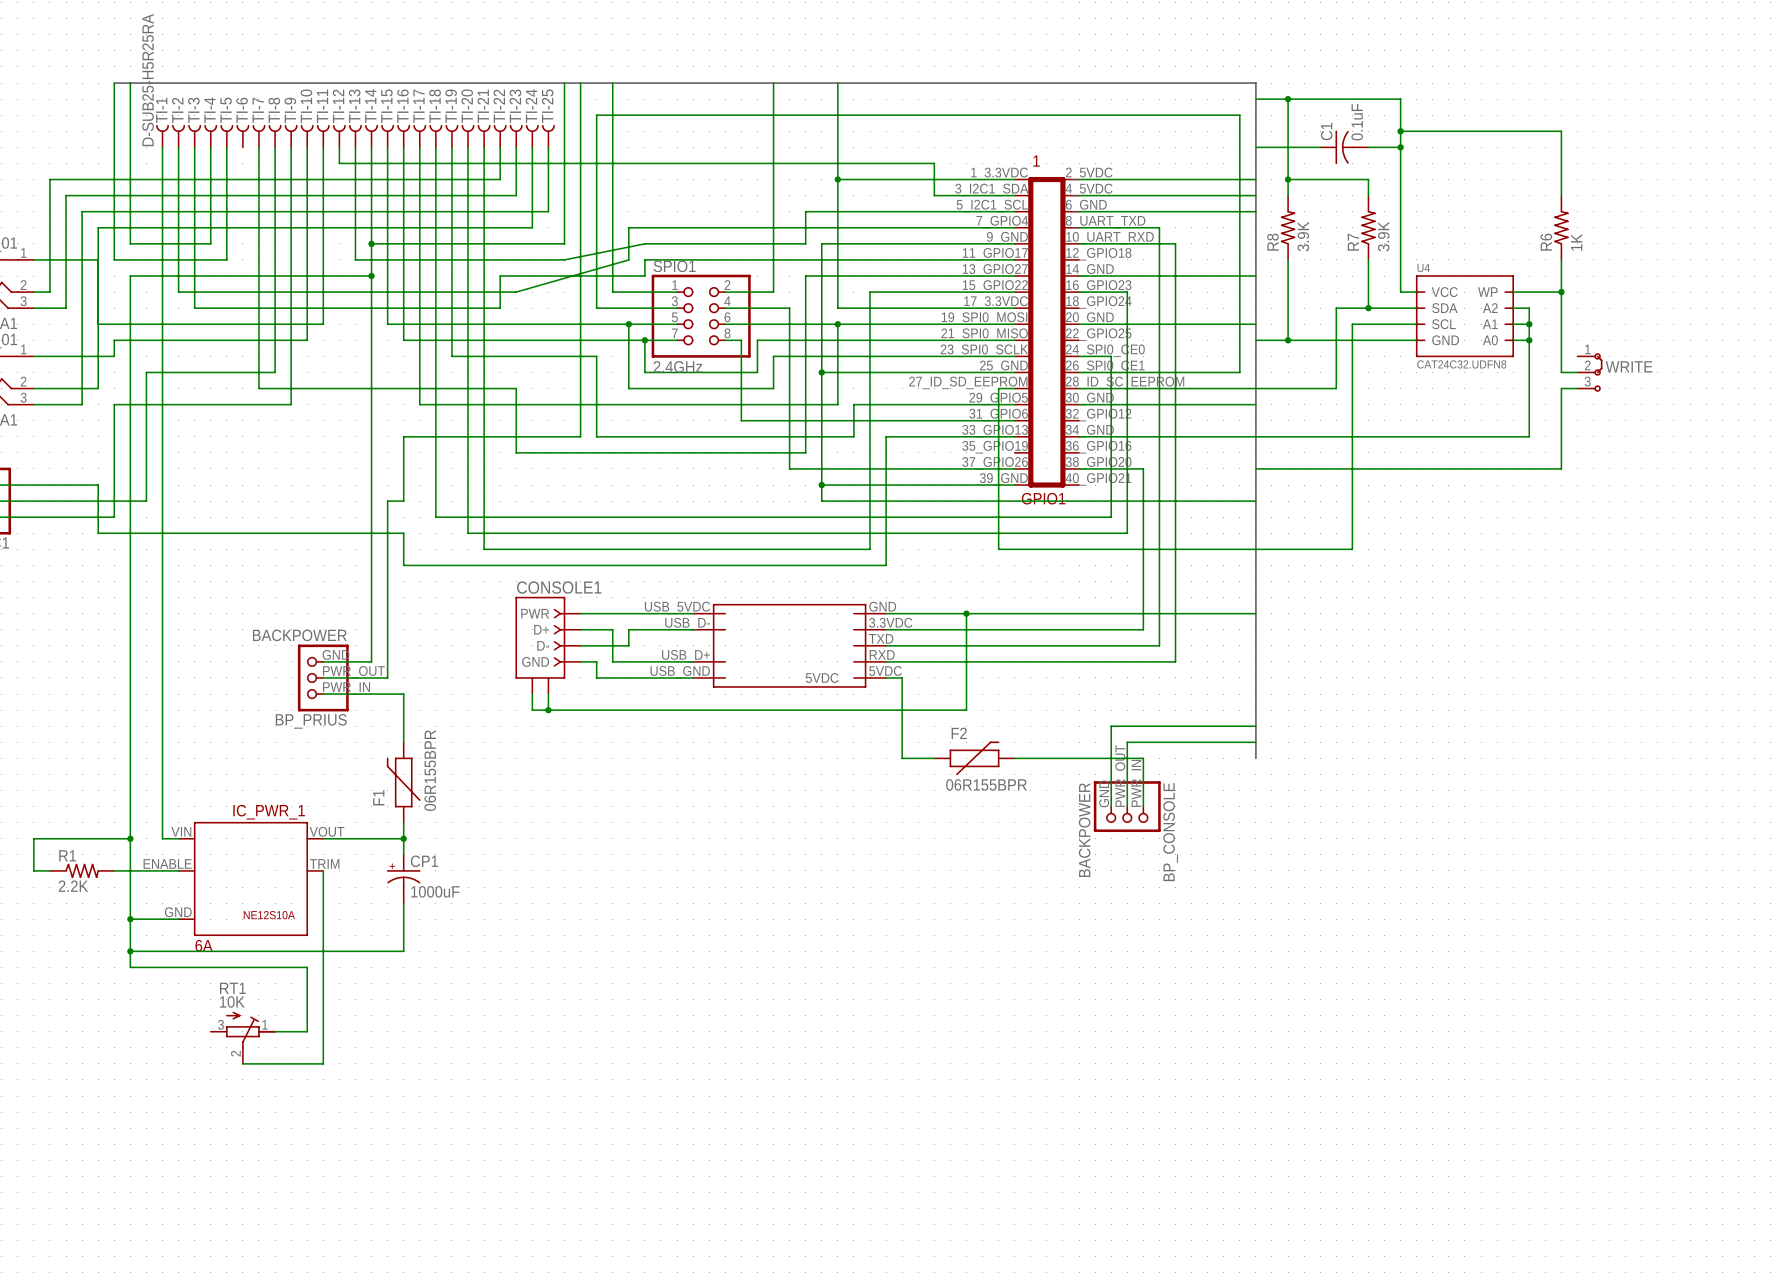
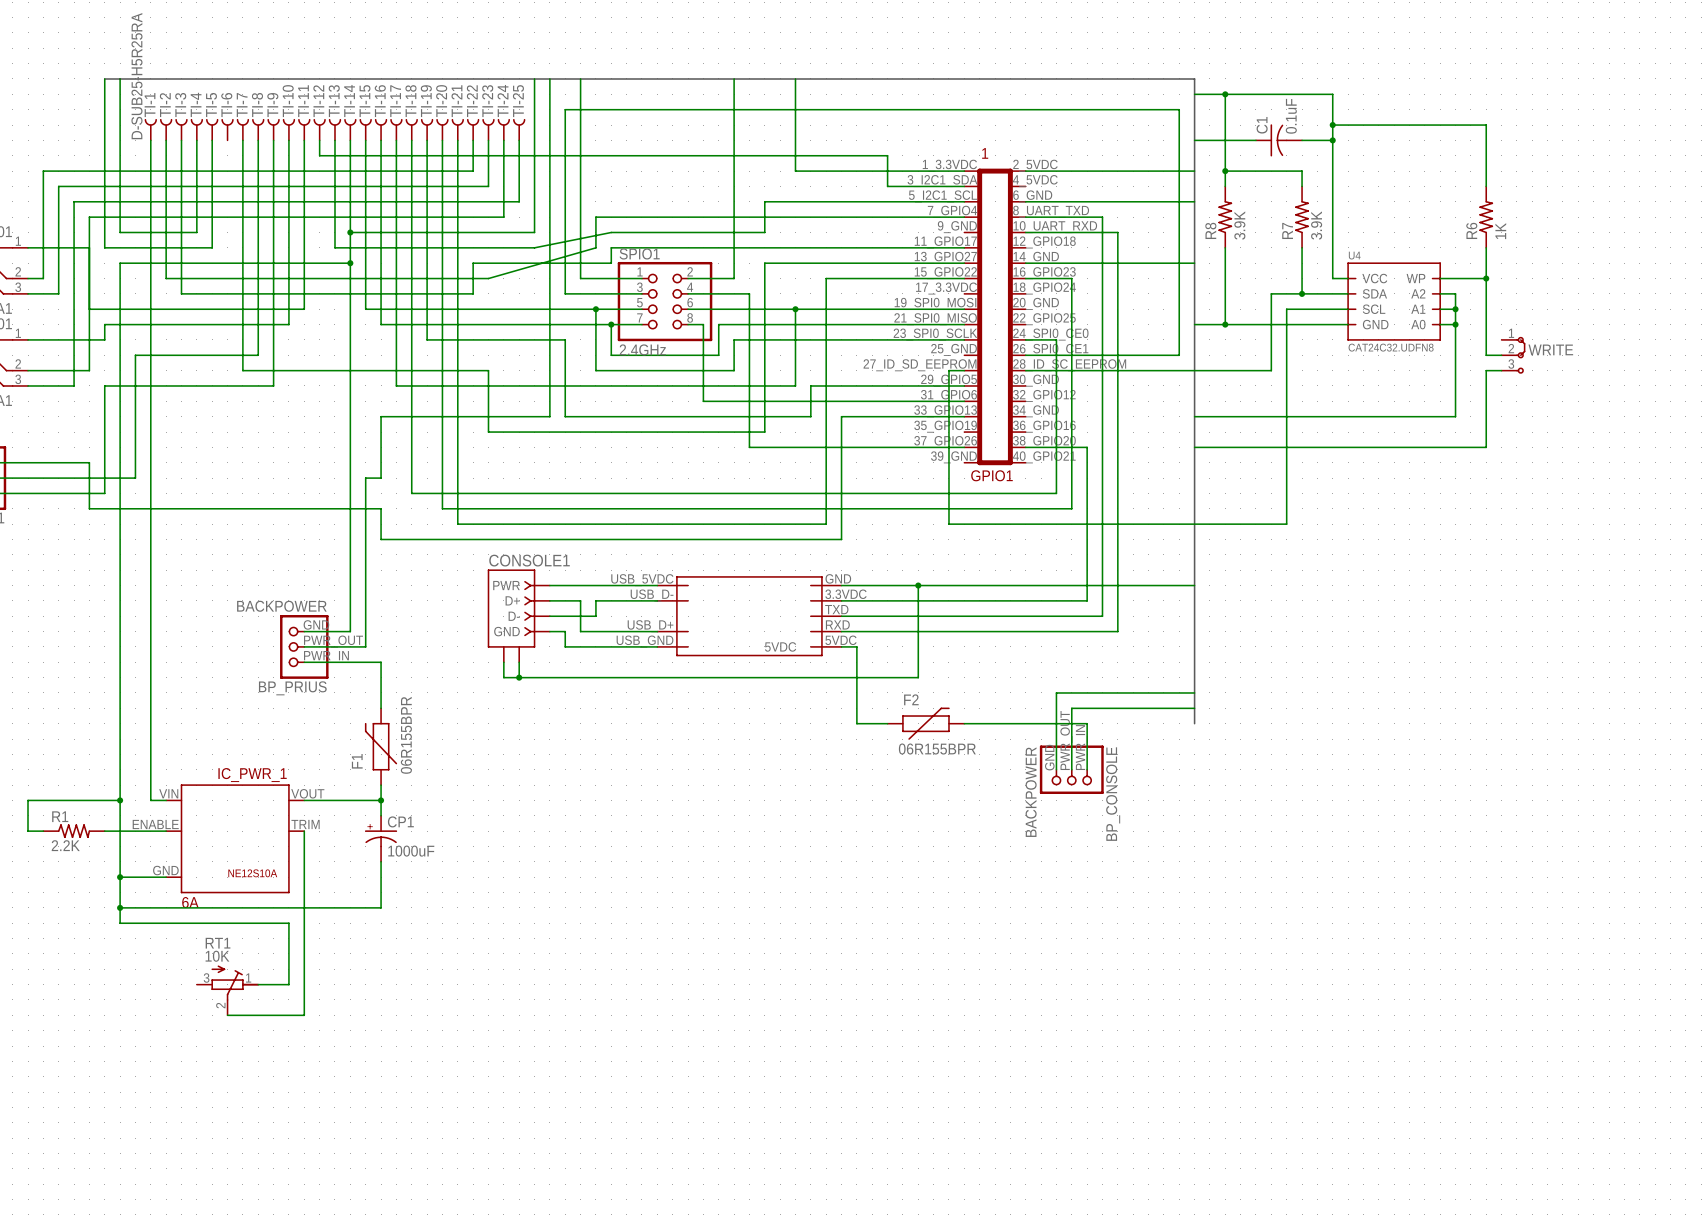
wire: (837, 179) (837, 308) (1014, 308) -> none
junction: (837, 179) -> none
wire: (1079, 195) (1255, 195) -> none
wire: (1014, 243) (821, 243) (821, 501) (1255, 501) -> none
wire: (1079, 324) (1255, 324) -> none
wire: (821, 372) (1014, 372) -> none
junction: (821, 372) -> none
wire: (1079, 404) (1255, 404) -> none
wire: (1079, 436) (1255, 436) -> none
wire: (821, 485) (1014, 485) -> none
junction: (821, 485) -> none

